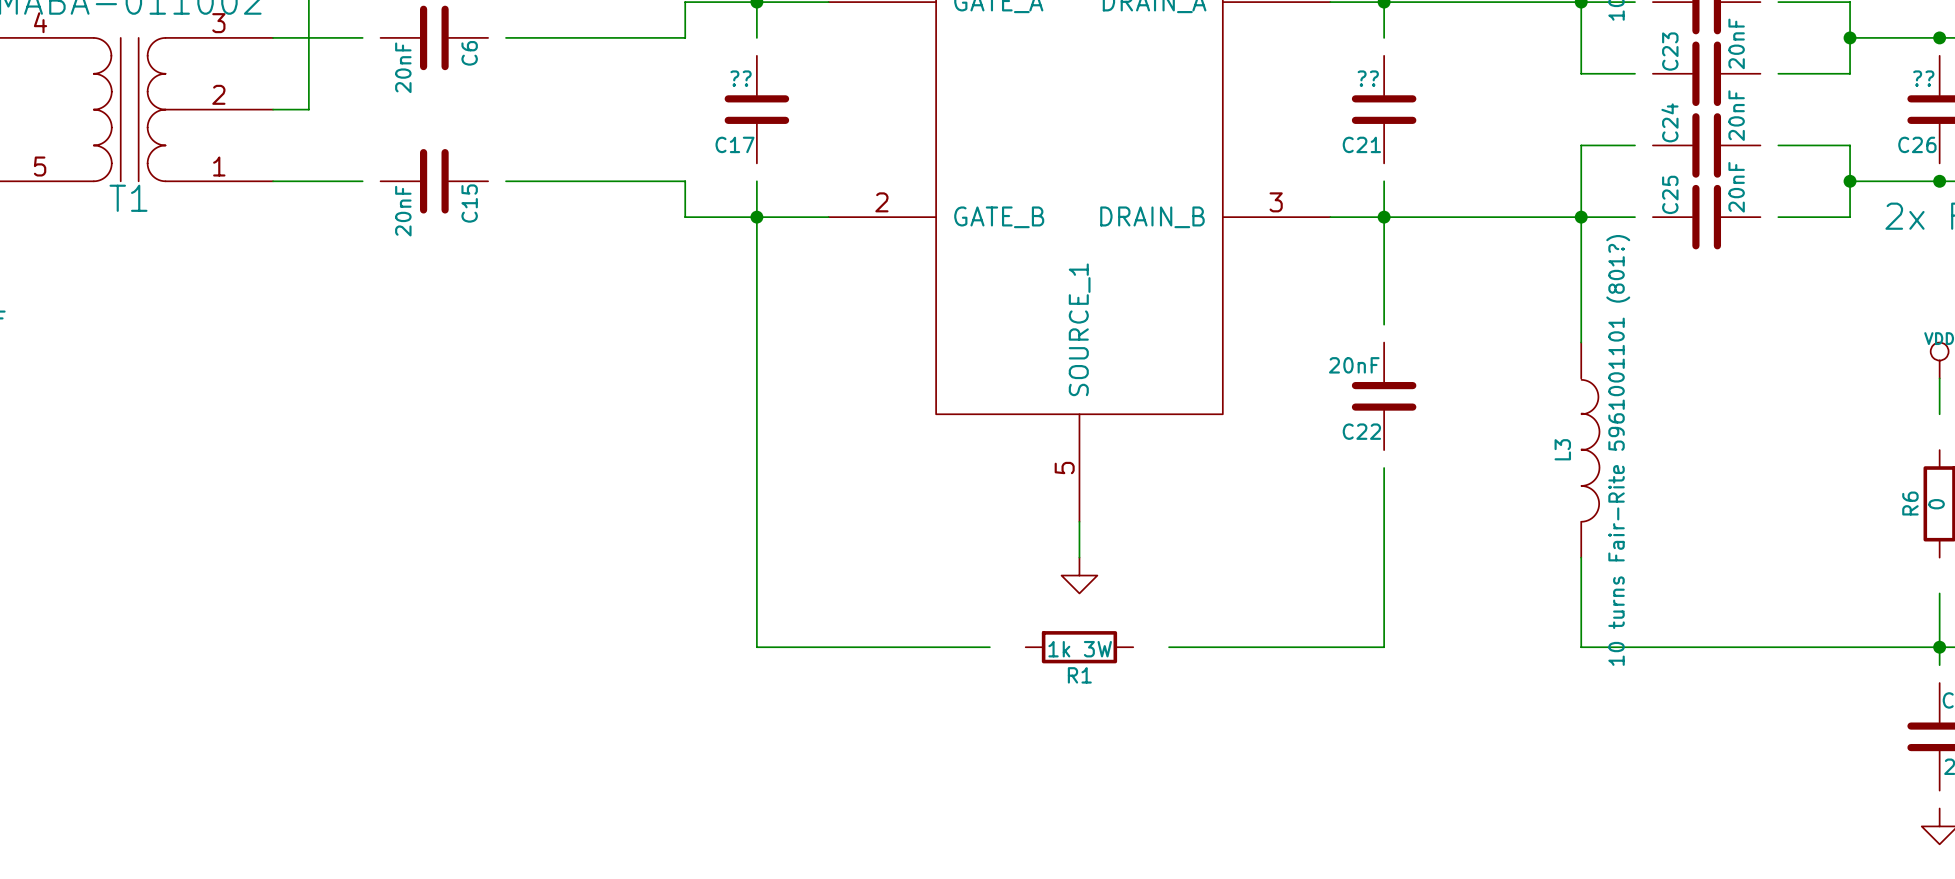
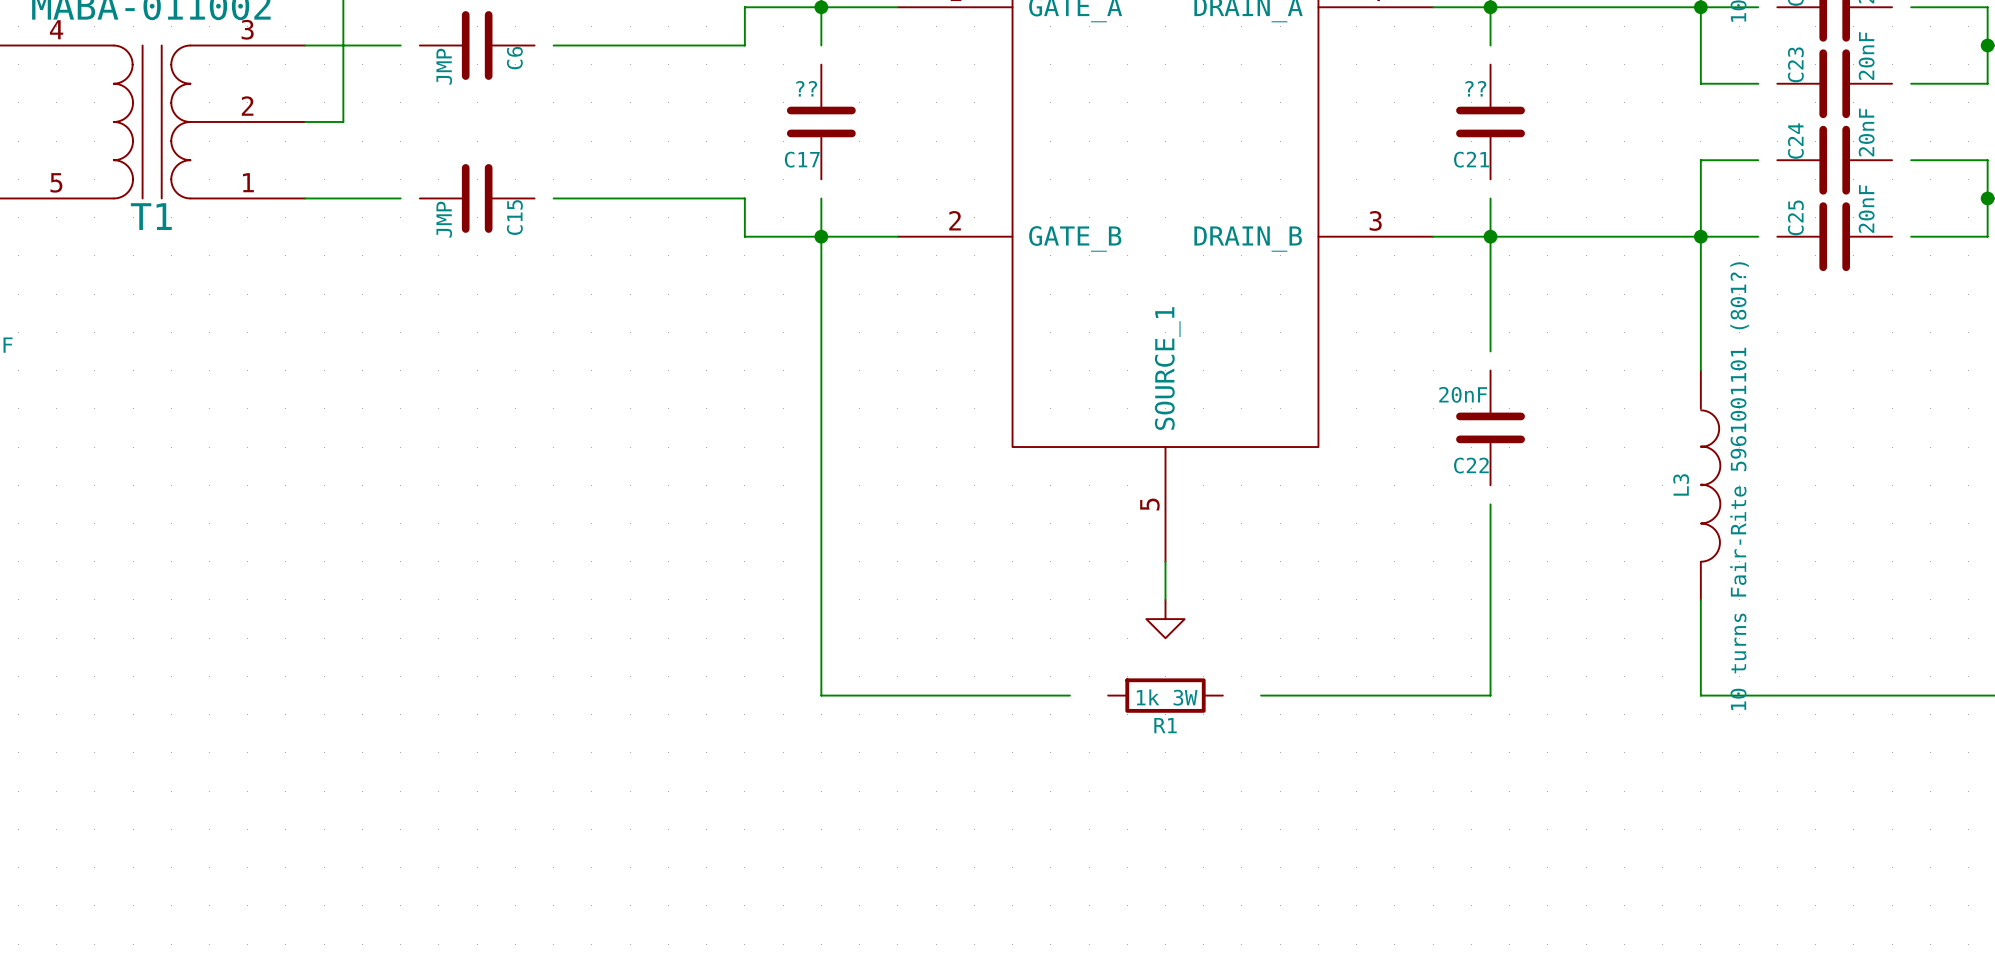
C6 value: 20nF (403, 67) -> JMP (444, 66)
C15 value: 20nF (403, 211) -> JMP (444, 219)

